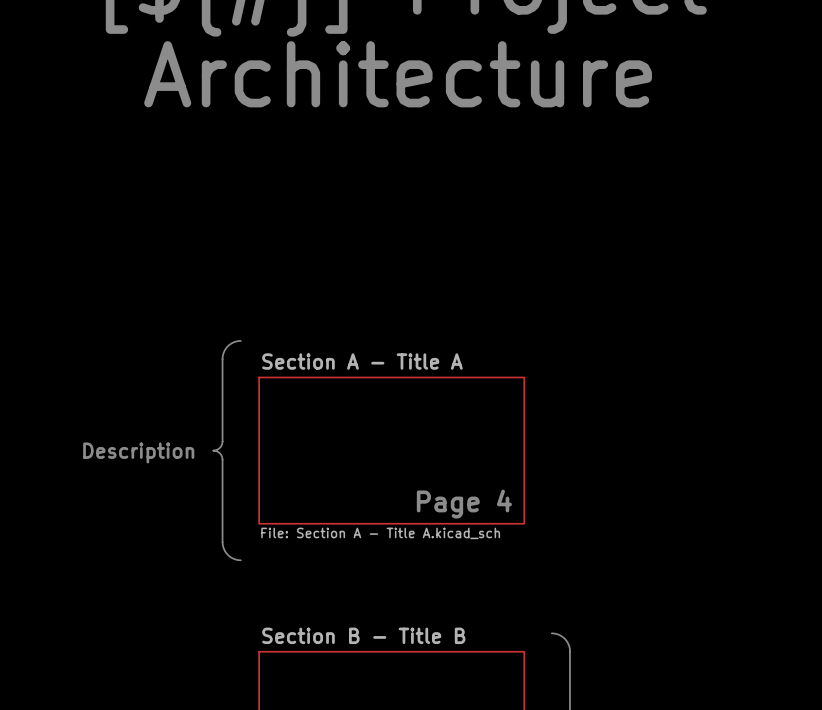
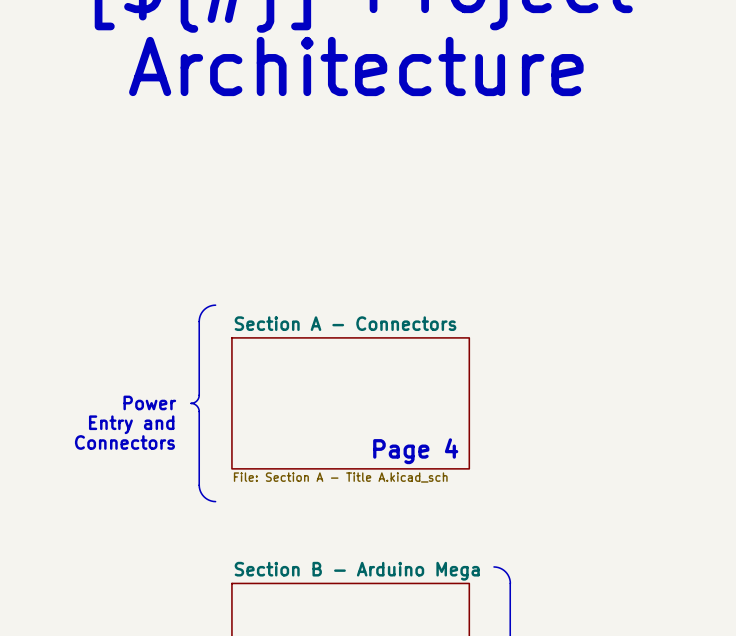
sheet Section A - Title A name: Section A - Title A (362, 361) -> Section A - Connectors (345, 323)
text: Description (138, 452) -> Power (149, 402)
text: none -> Entry and (131, 424)
text: none -> Connectors (124, 442)
sheet Section B - Title B name: Section B - Title B (363, 635) -> Section B - Arduino Mega (357, 571)

